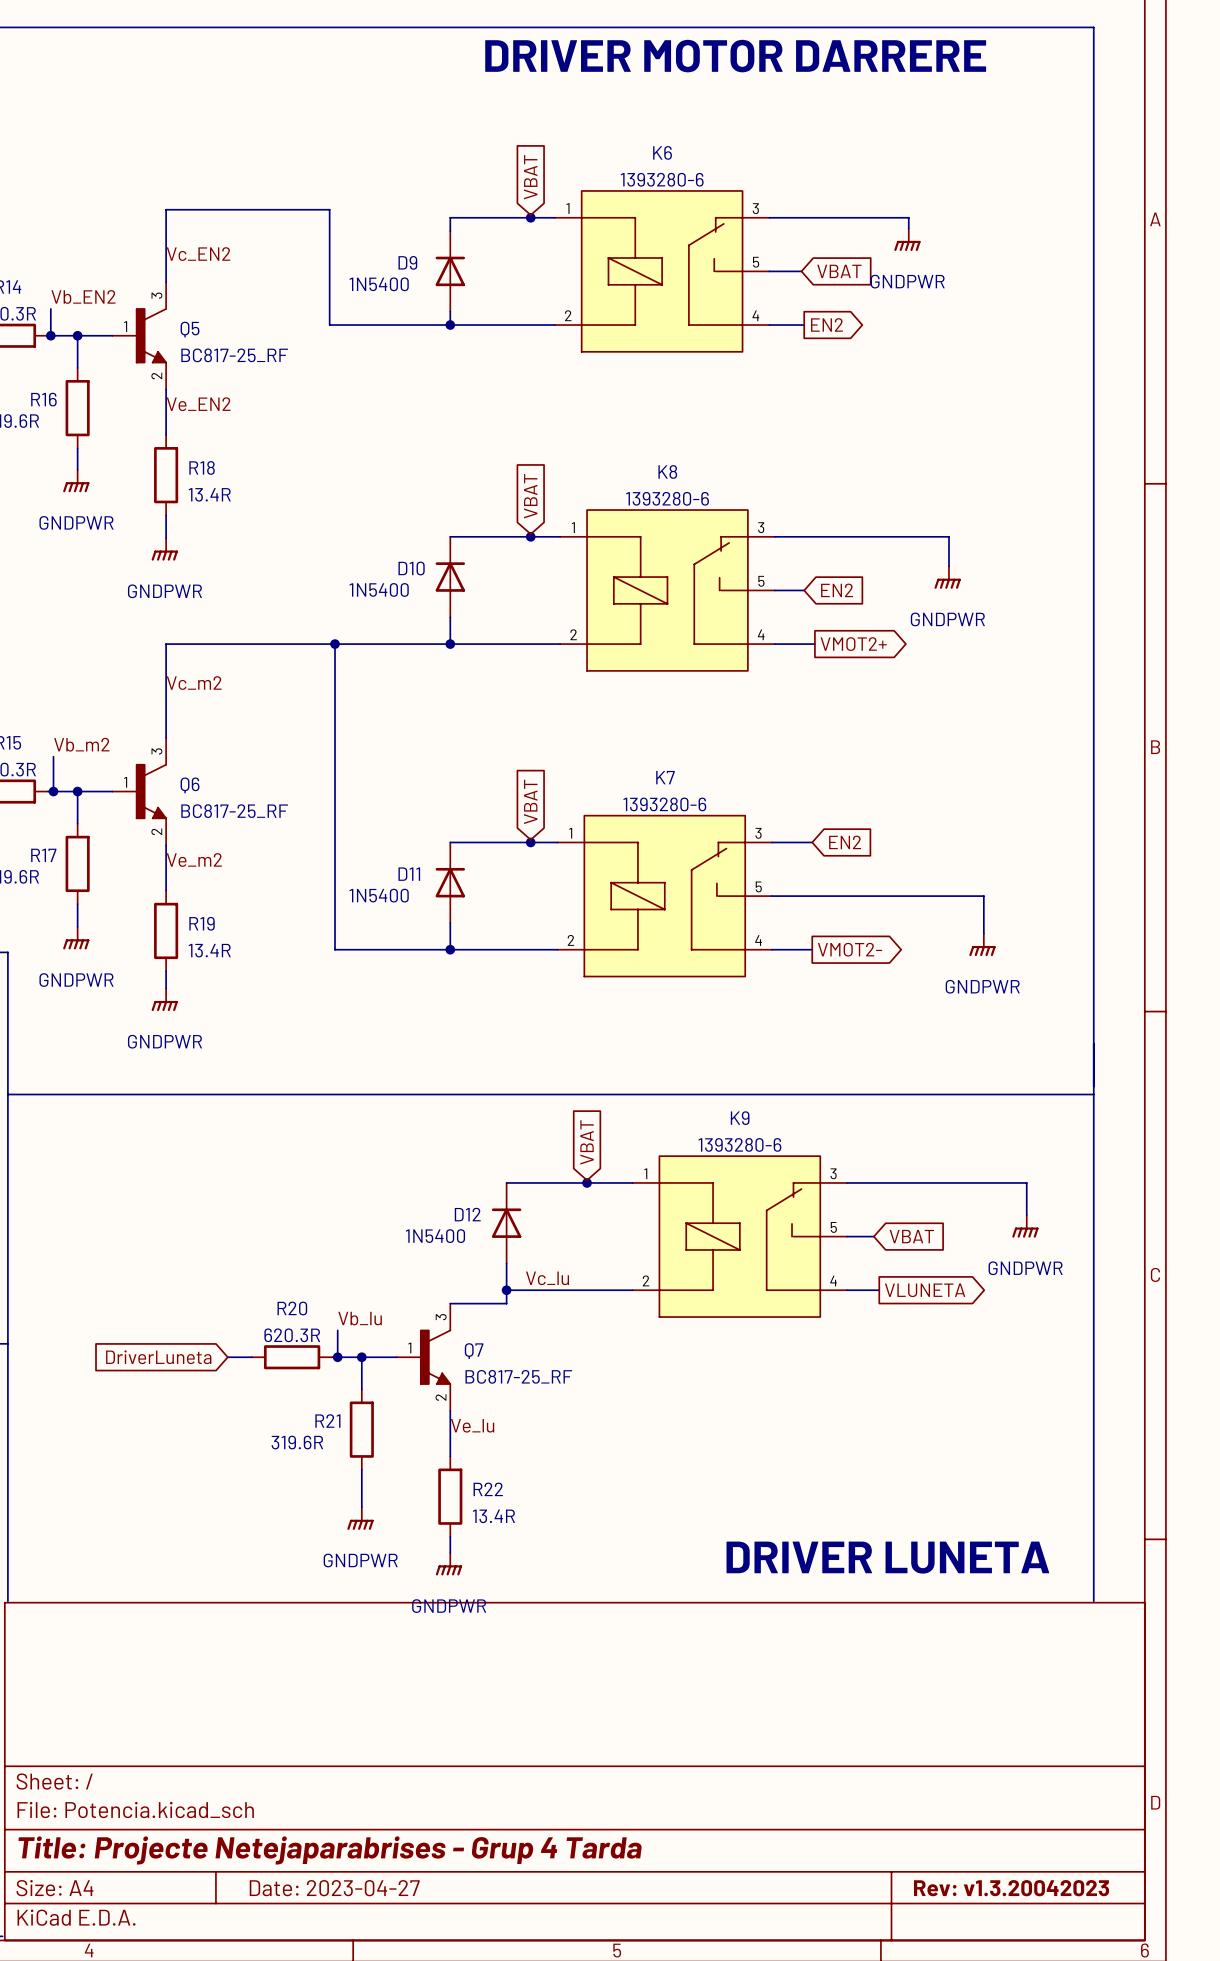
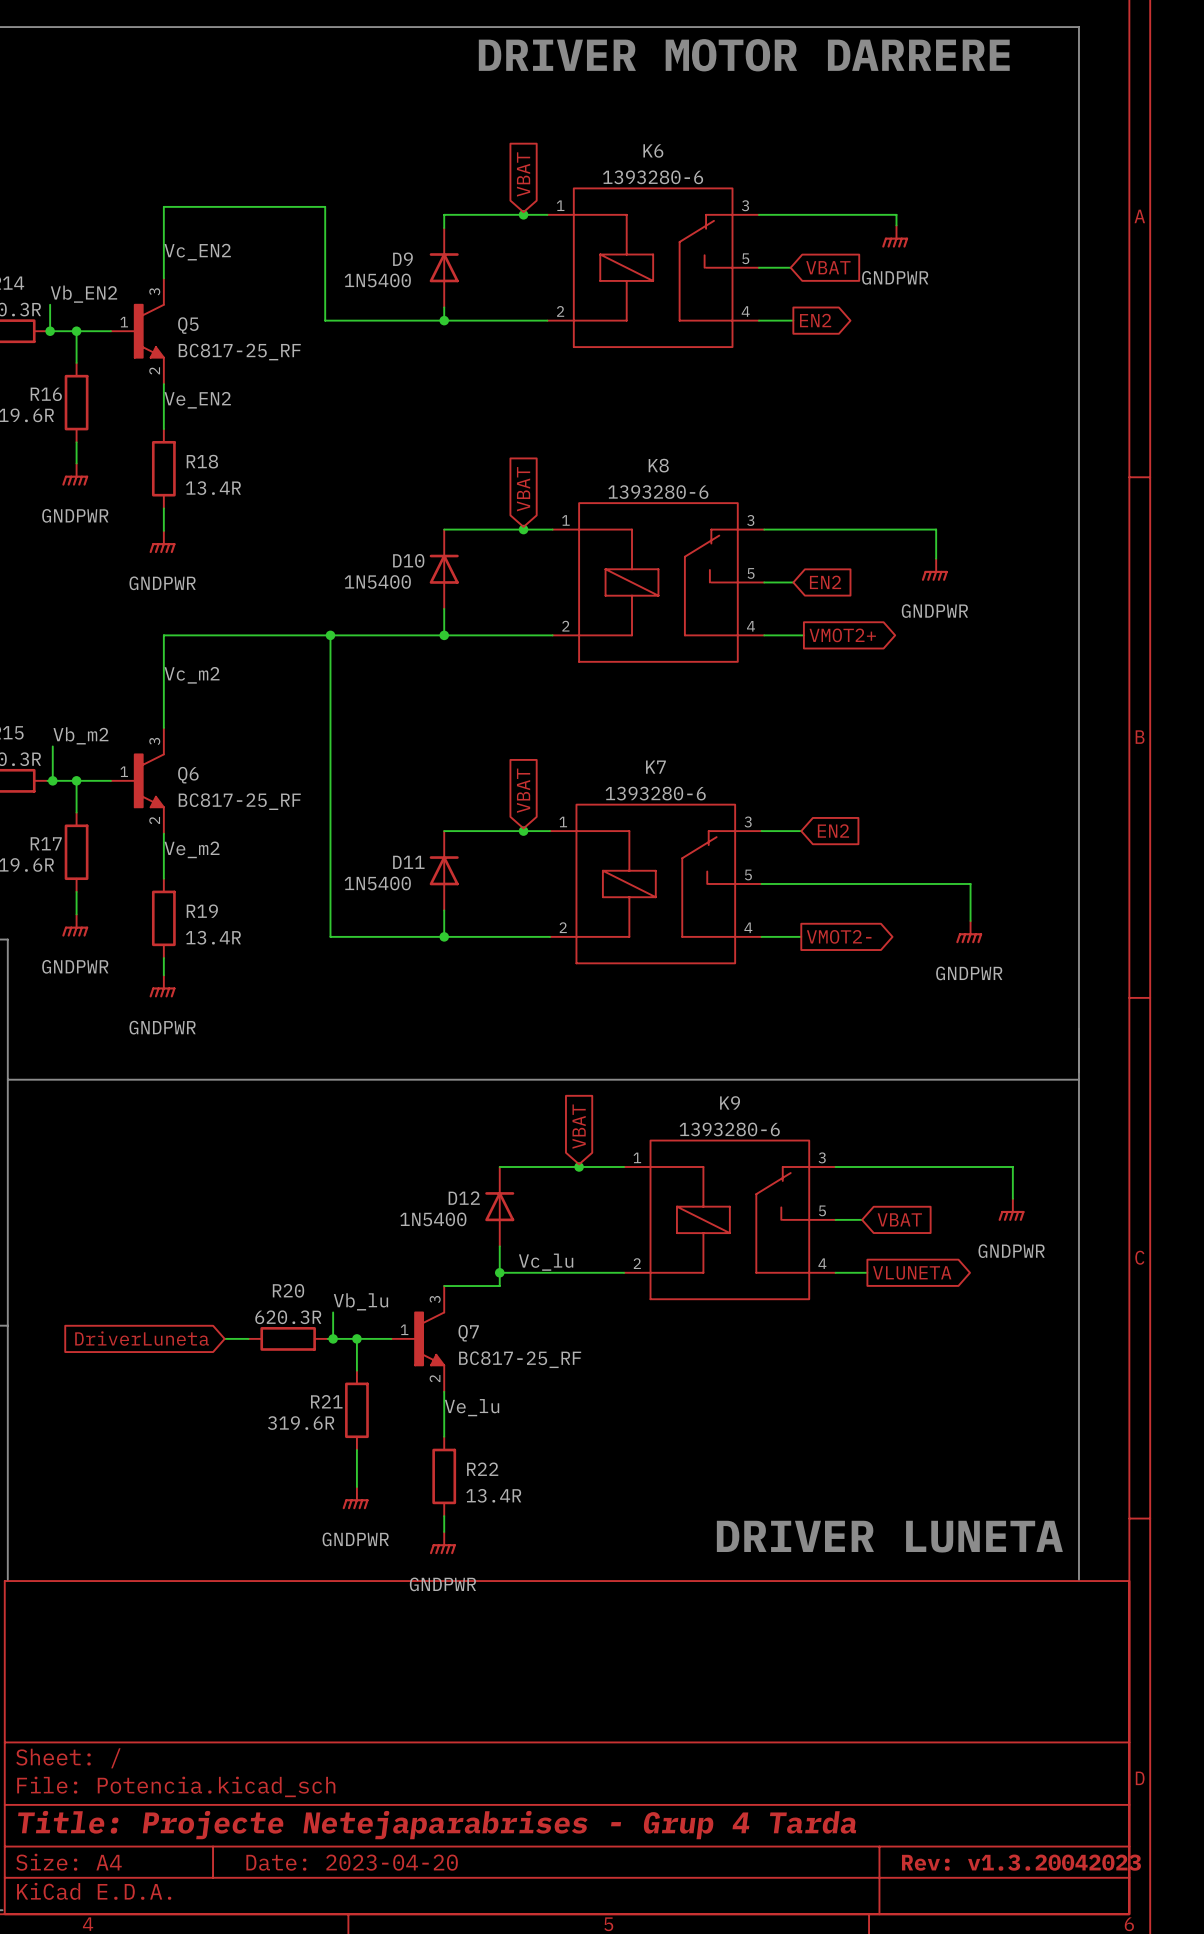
title block: Date: 2023-04-27 (334, 1888) -> Date: 2023-04-20 (352, 1862)

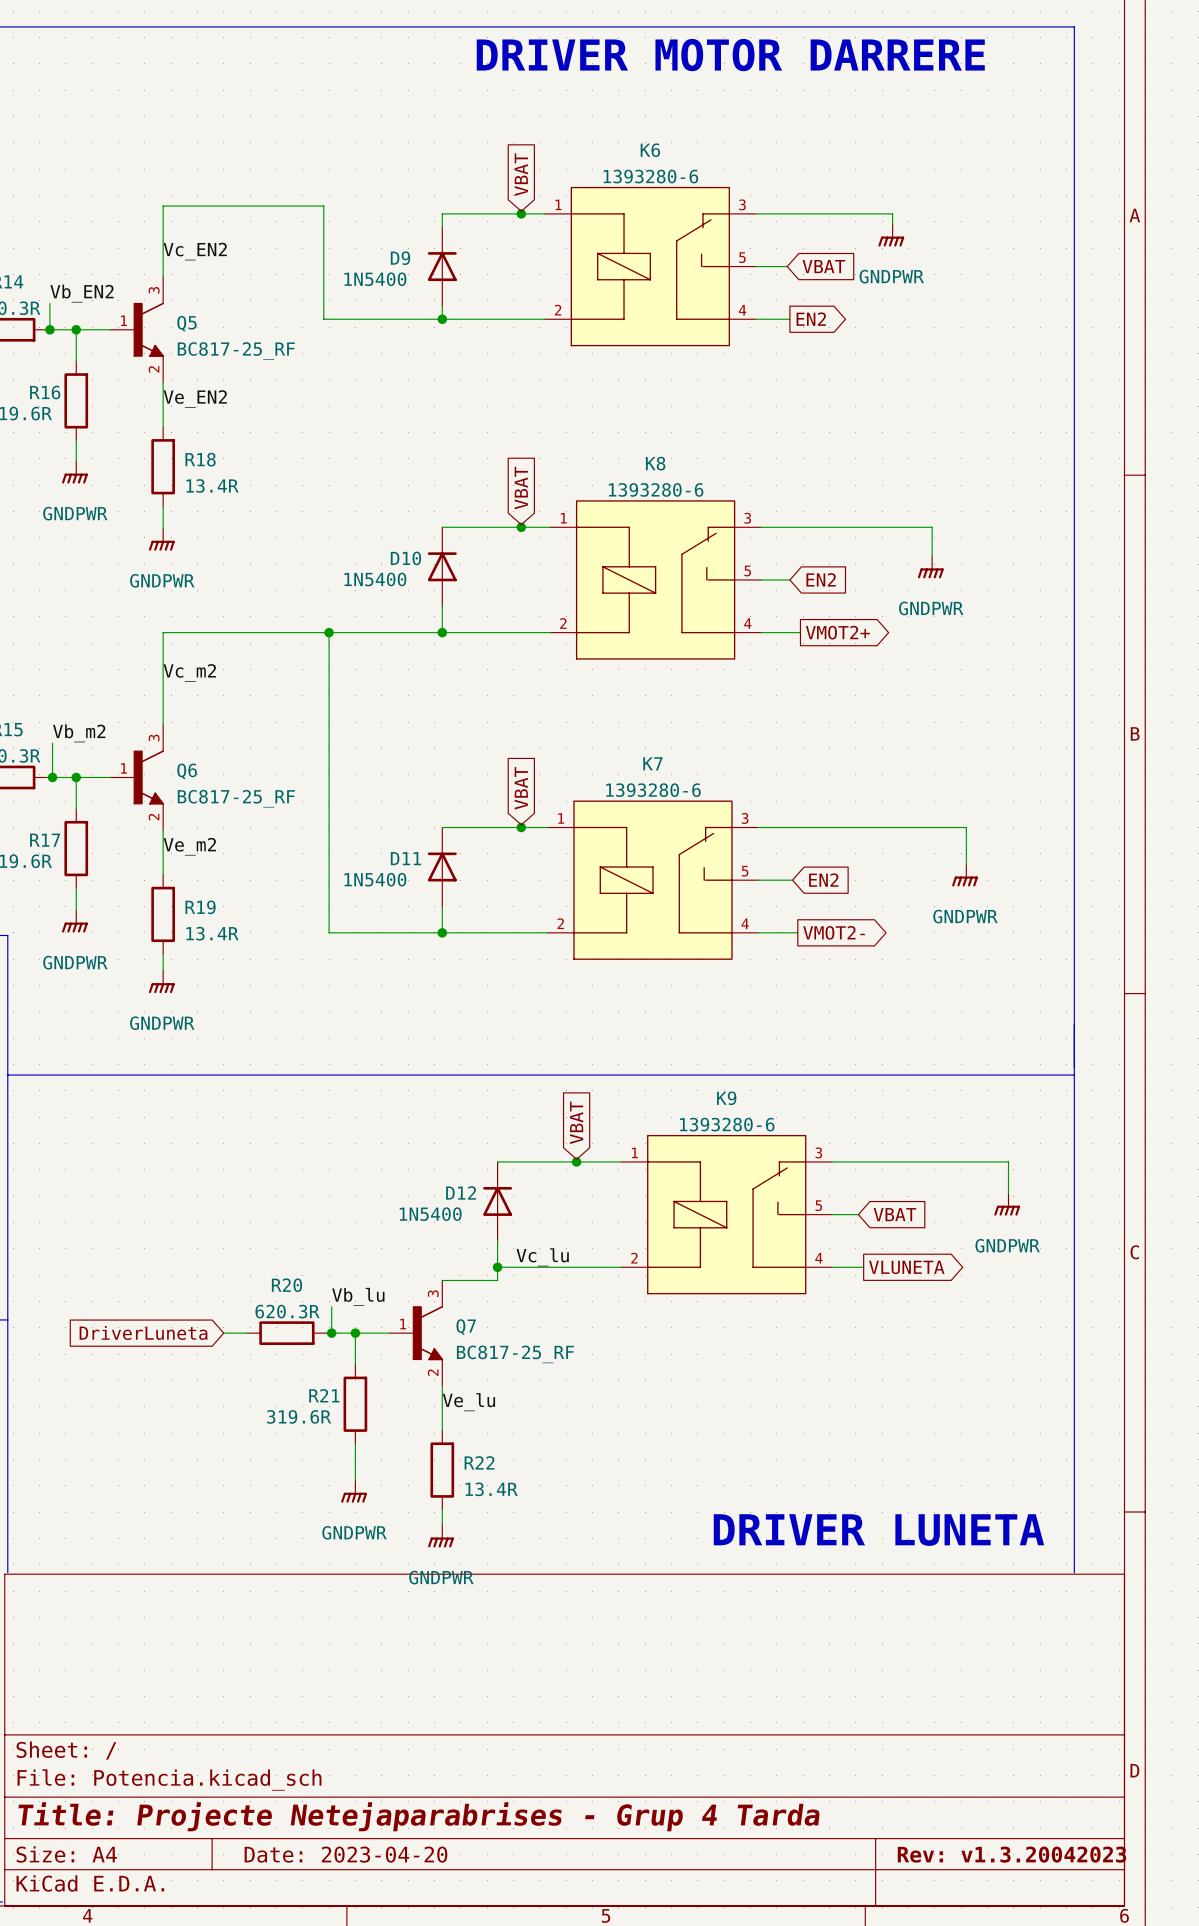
global label position: EN2 (833, 830) -> EN2 (823, 880)
wire: none -> (797, 827) (966, 827) (966, 864)
wire: (795, 883) (970, 883) (970, 921) -> none
power symbol position: GNDPWR (969, 932) -> GNDPWR (965, 875)

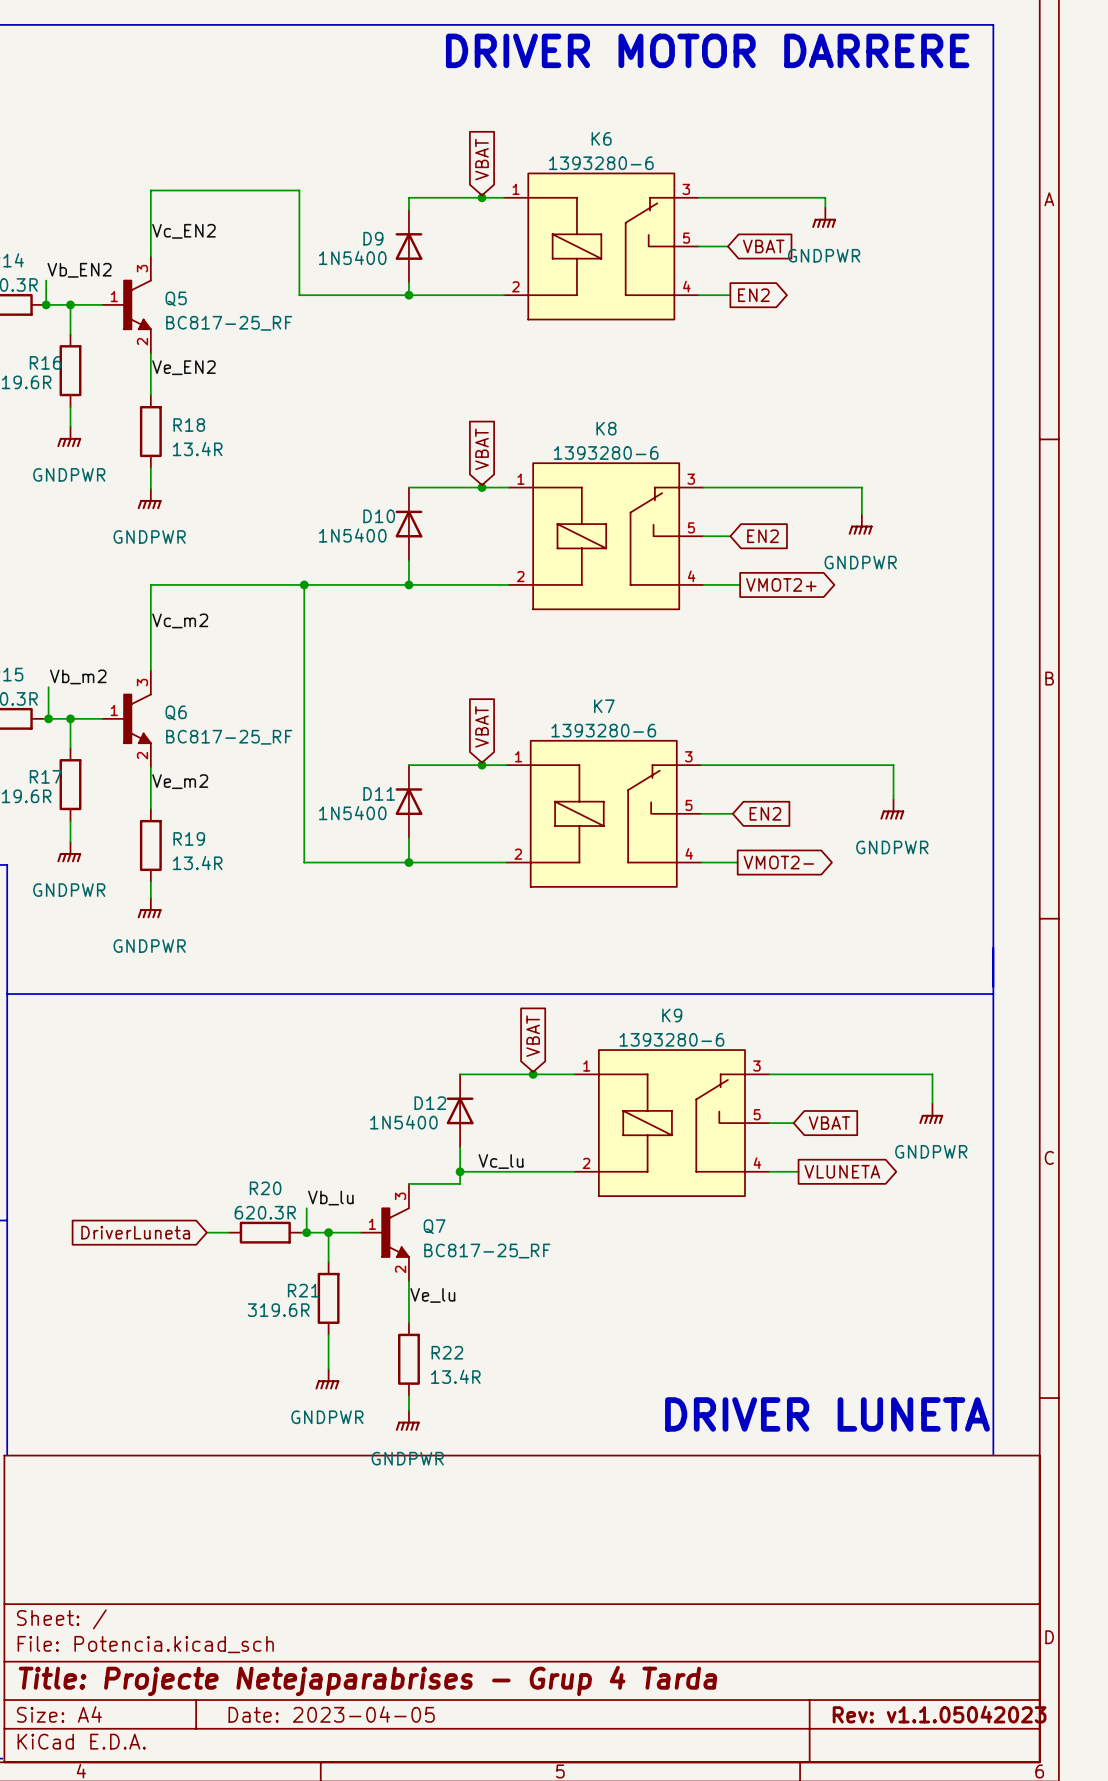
title block: Date: 2023-04-20 (345, 1854) -> Date: 2023-04-05 (331, 1714)
title block: Rev: v1.3.20042023 (1011, 1854) -> Rev: v1.1.05042023 (939, 1714)

